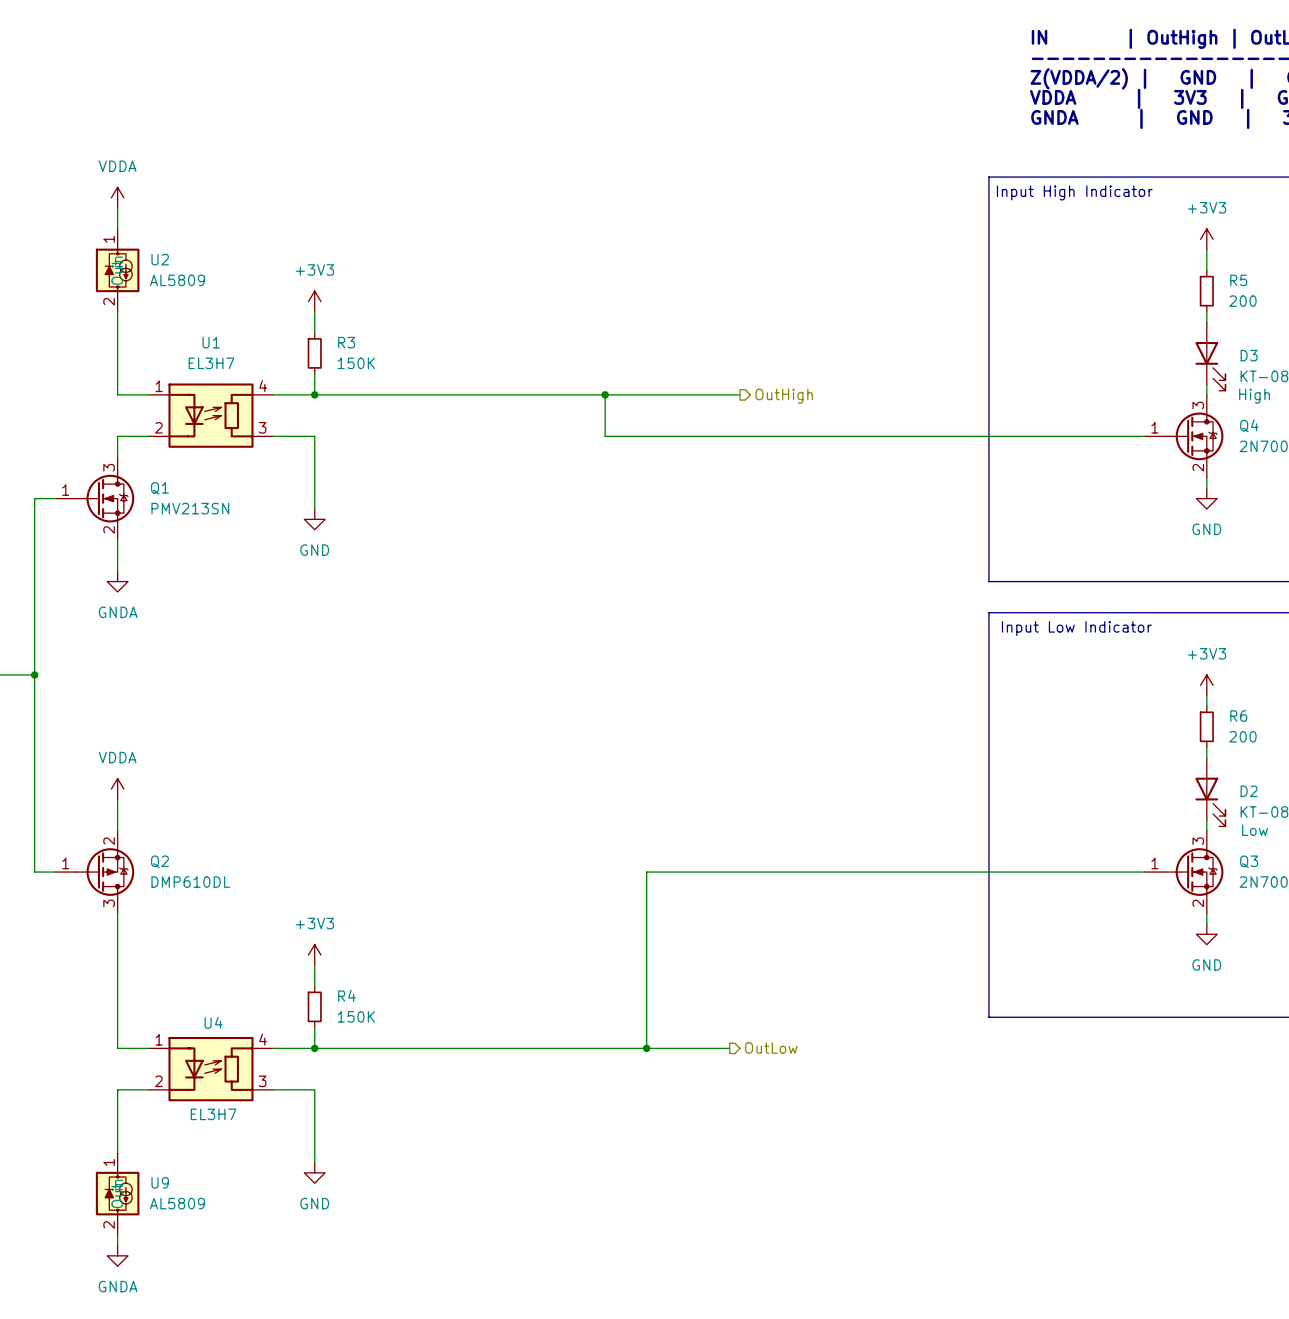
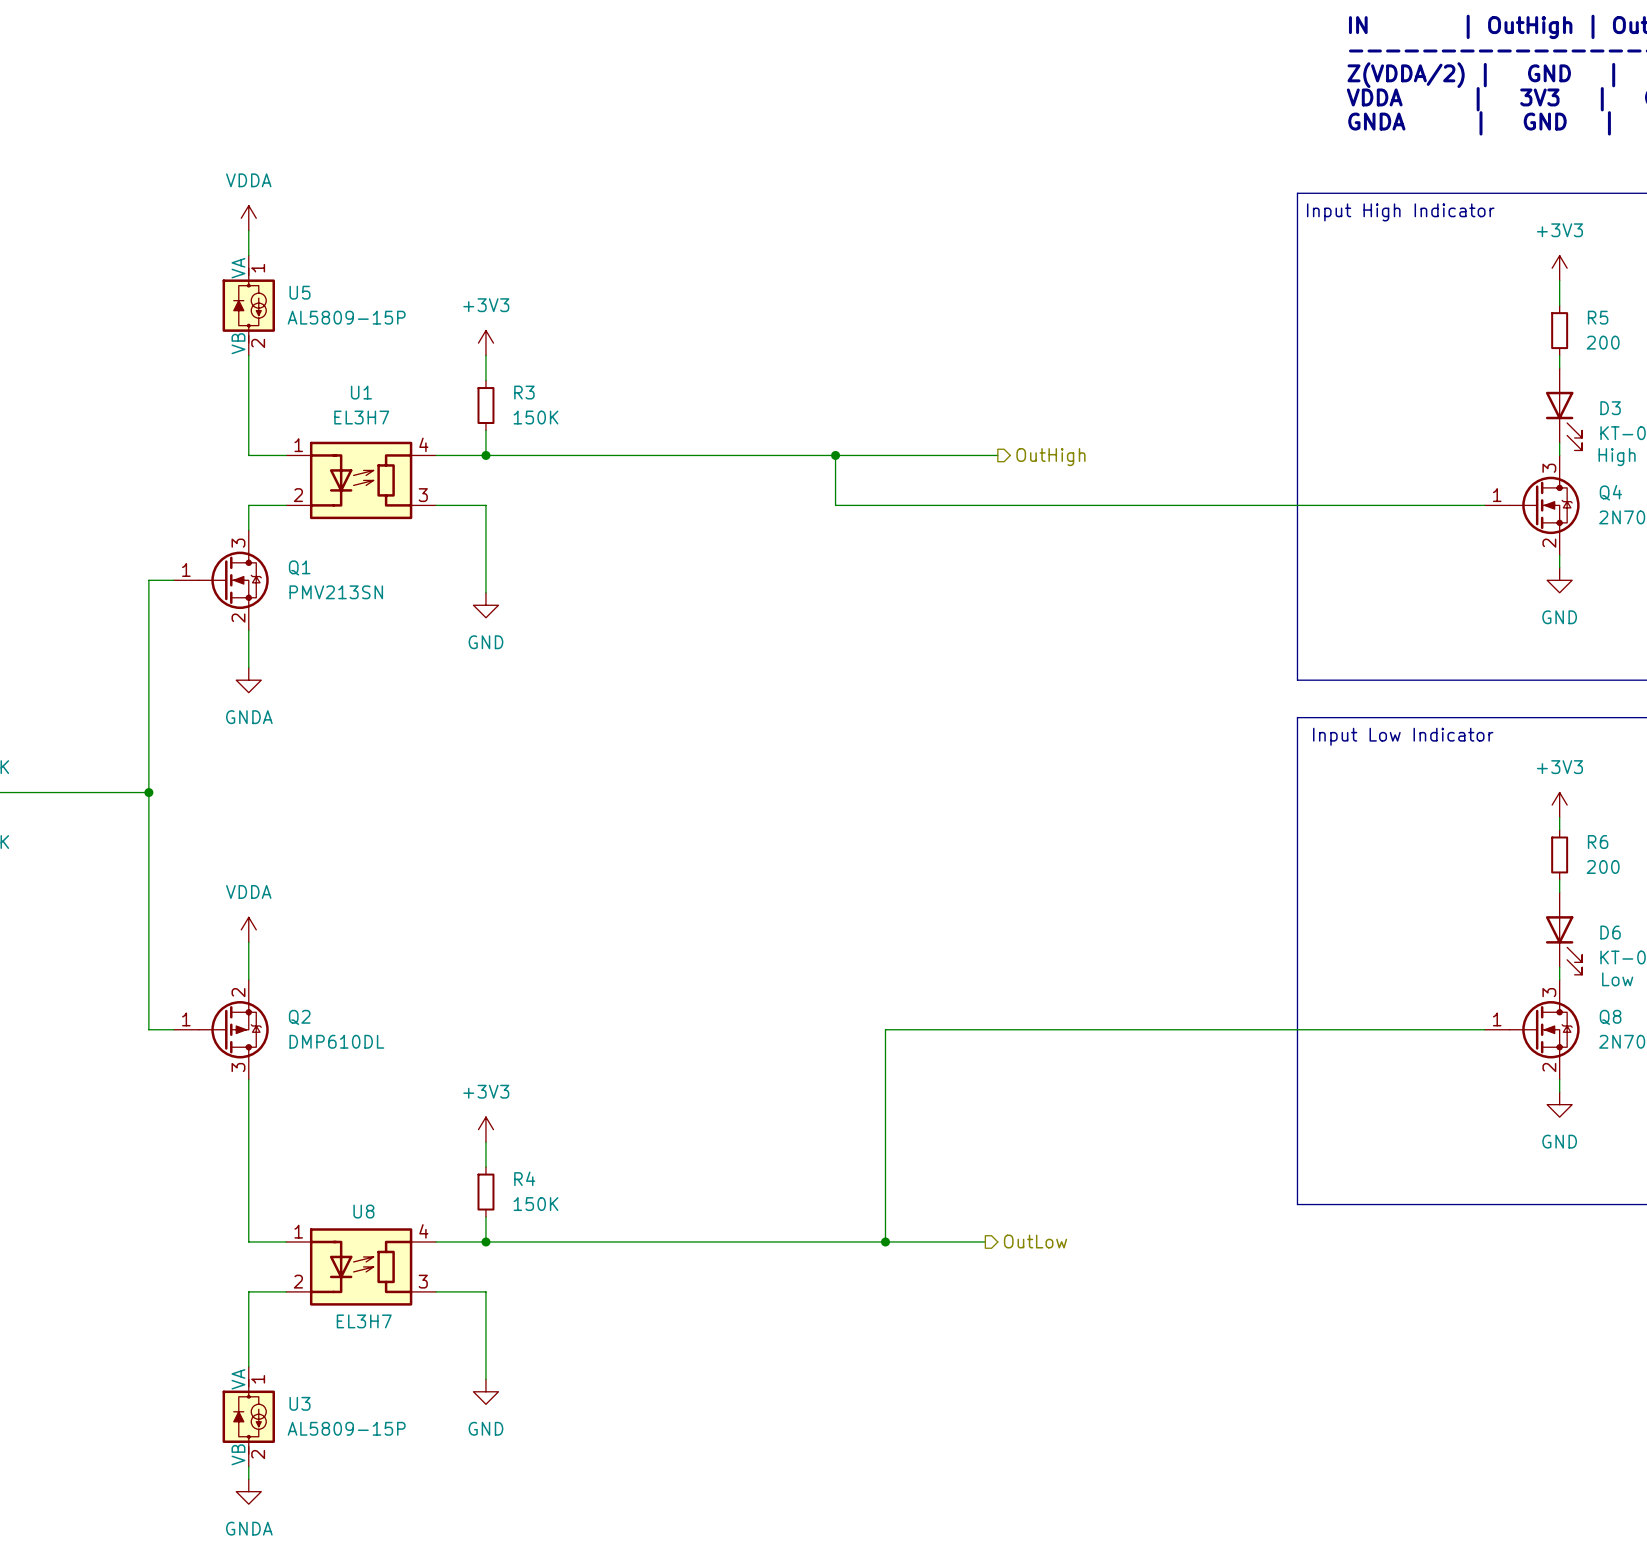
U2: AL5809 (117, 270) -> none
U5: none -> AL5809-15P (248, 305)
D2 name: D2 (1249, 791) -> D6 (1610, 932)
Q3 name: Q3 (1249, 861) -> Q8 (1610, 1017)
U4 name: U4 (213, 1022) -> U8 (363, 1211)
U9: AL5809 (117, 1193) -> none
U3: none -> AL5809-15P (248, 1416)

